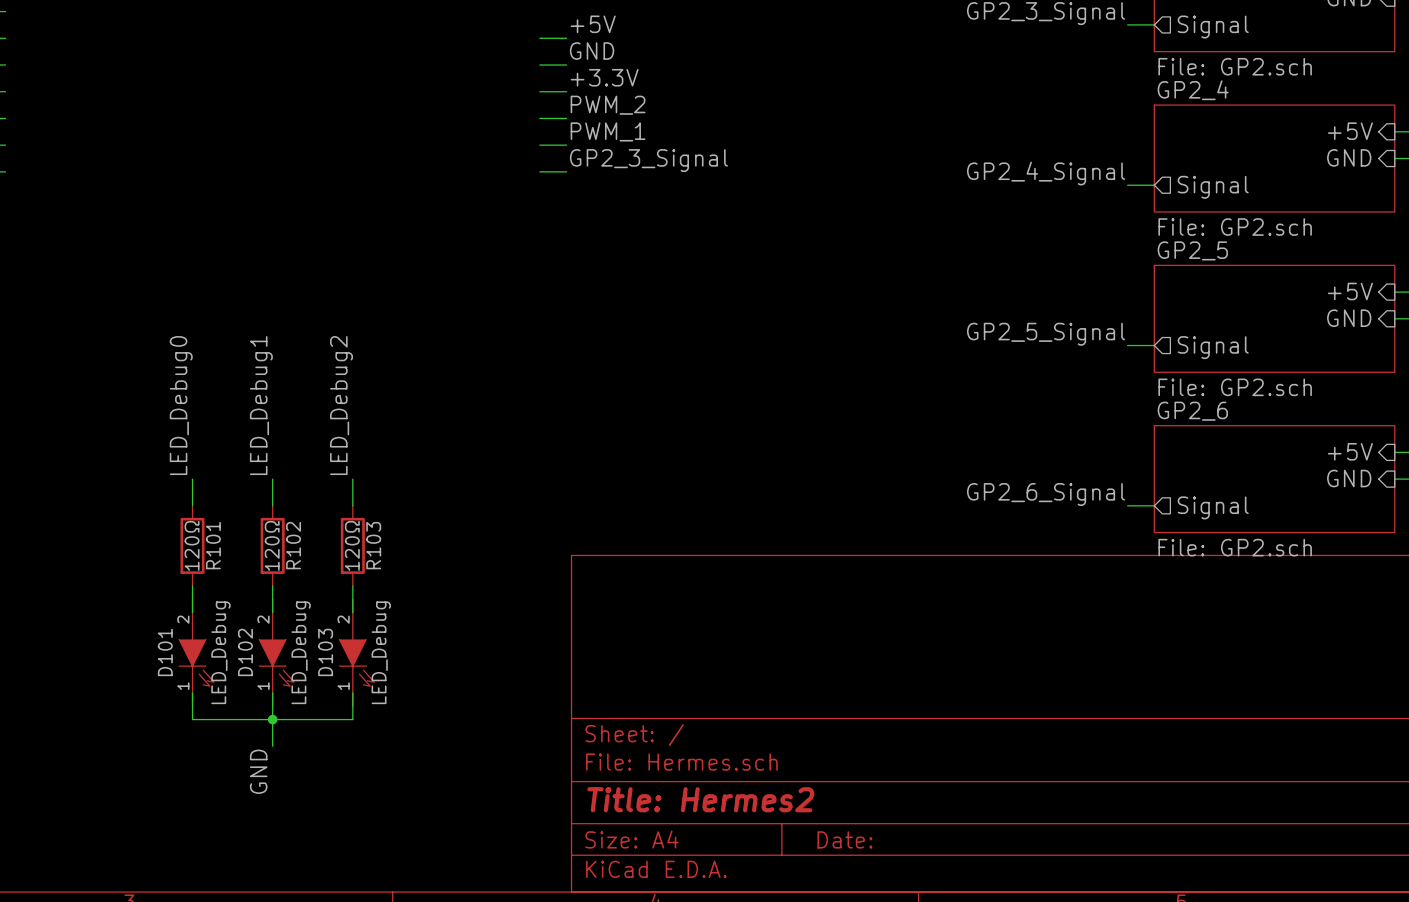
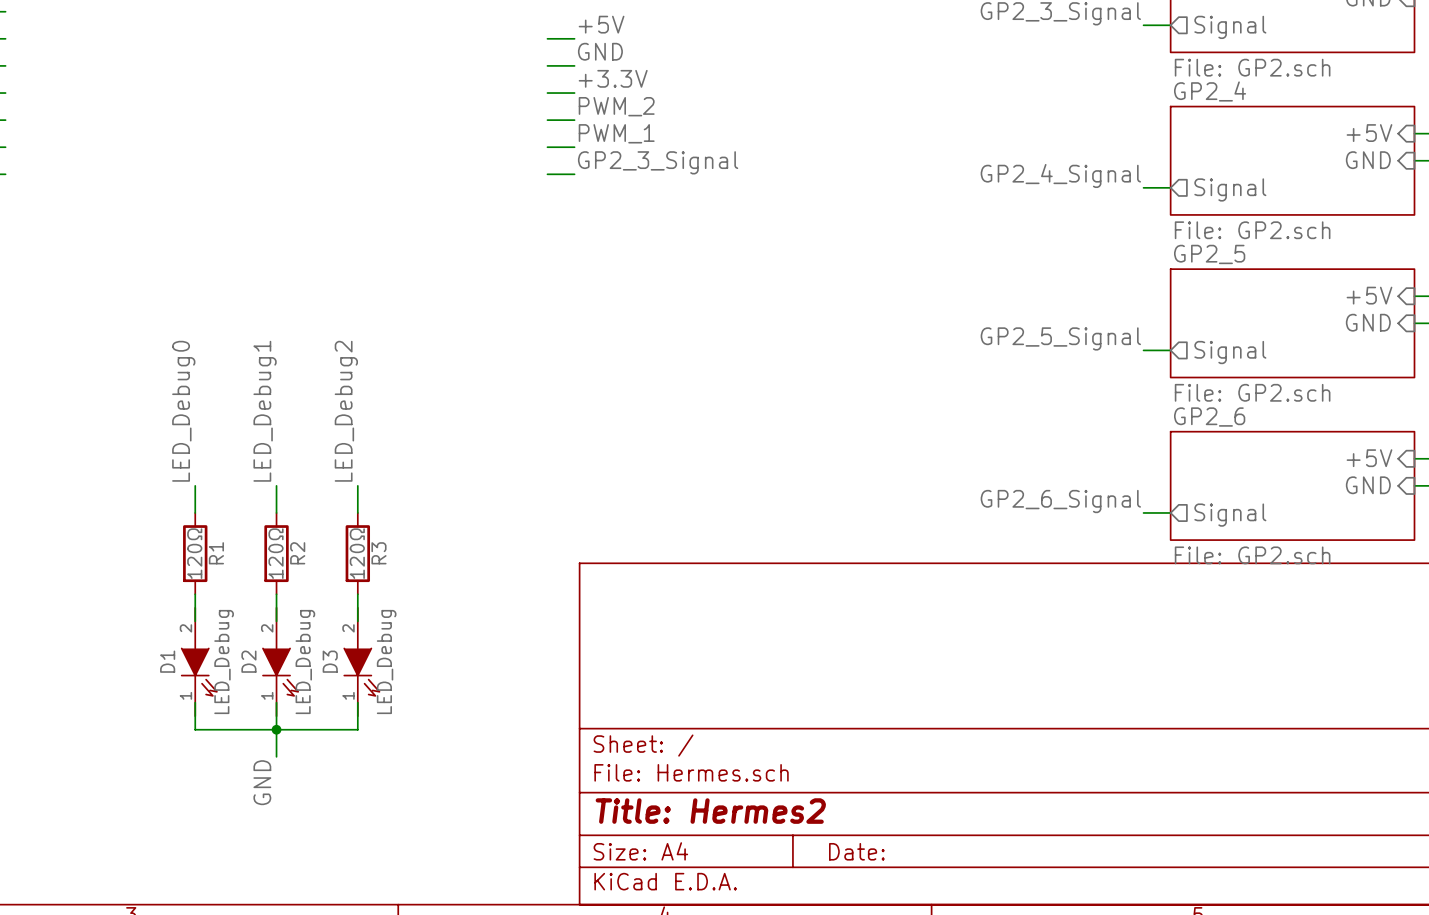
R101 name: R101 (213, 545) -> R1 (216, 553)
R102 name: R102 (293, 545) -> R2 (297, 553)
R103 name: R103 (373, 545) -> R3 (378, 553)
D101 name: D101 (165, 652) -> D1 (167, 661)
D102 name: D102 (245, 652) -> D2 (248, 661)
D103 name: D103 (325, 652) -> D3 (330, 661)

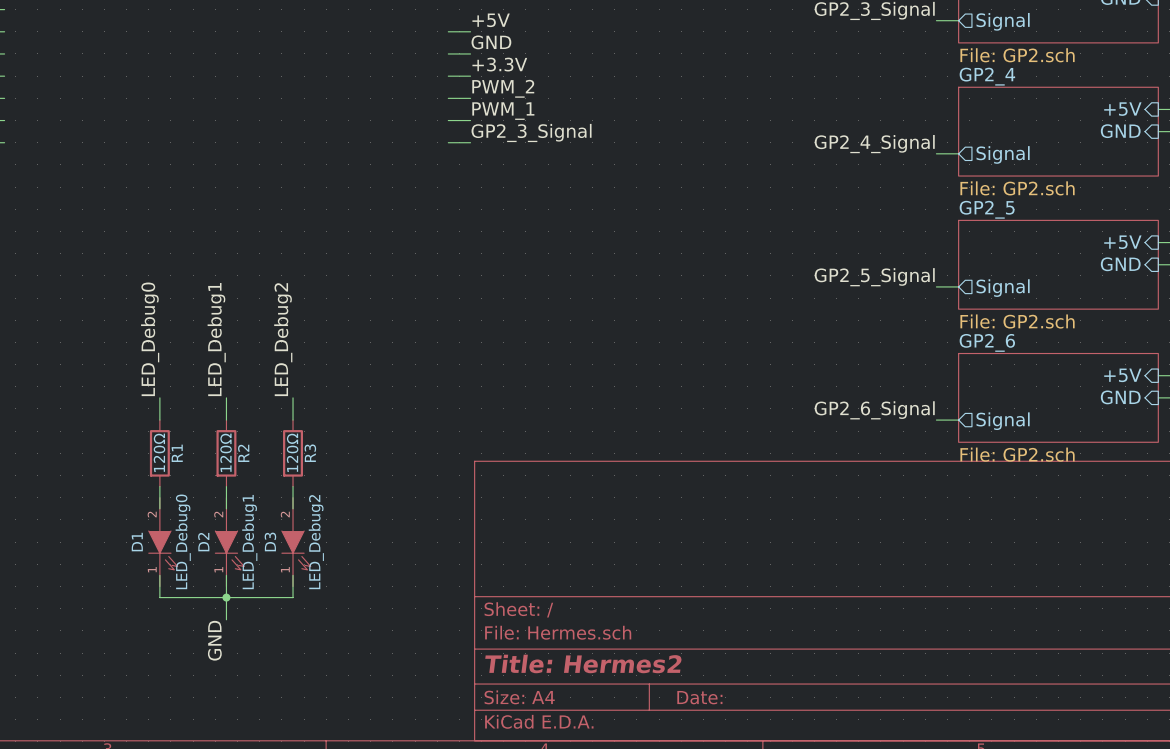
D1 value: LED_Debug (224, 662) -> LED_Debug0 (183, 541)
D2 value: LED_Debug (305, 662) -> LED_Debug1 (249, 542)
D3 value: LED_Debug (386, 662) -> LED_Debug2 (316, 542)

